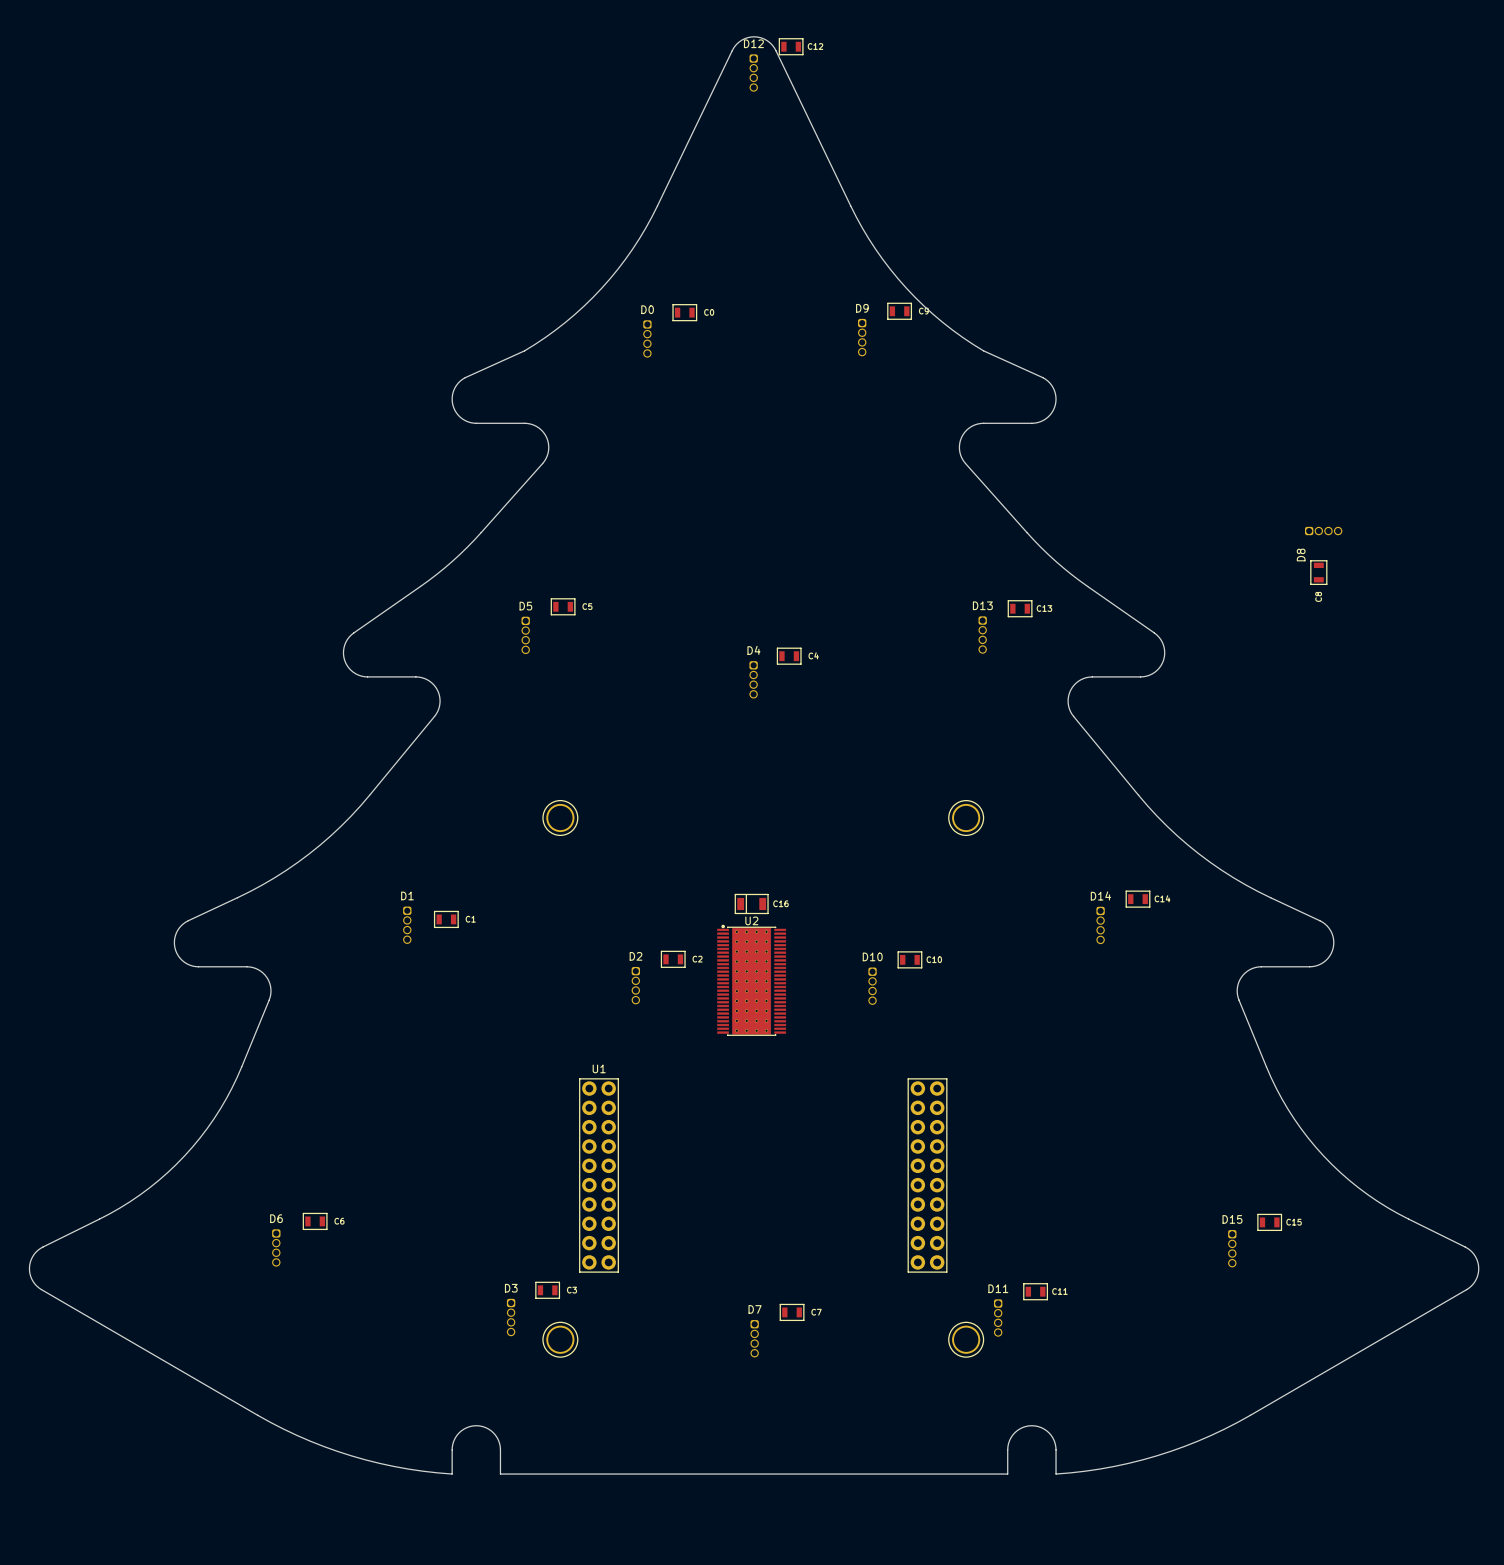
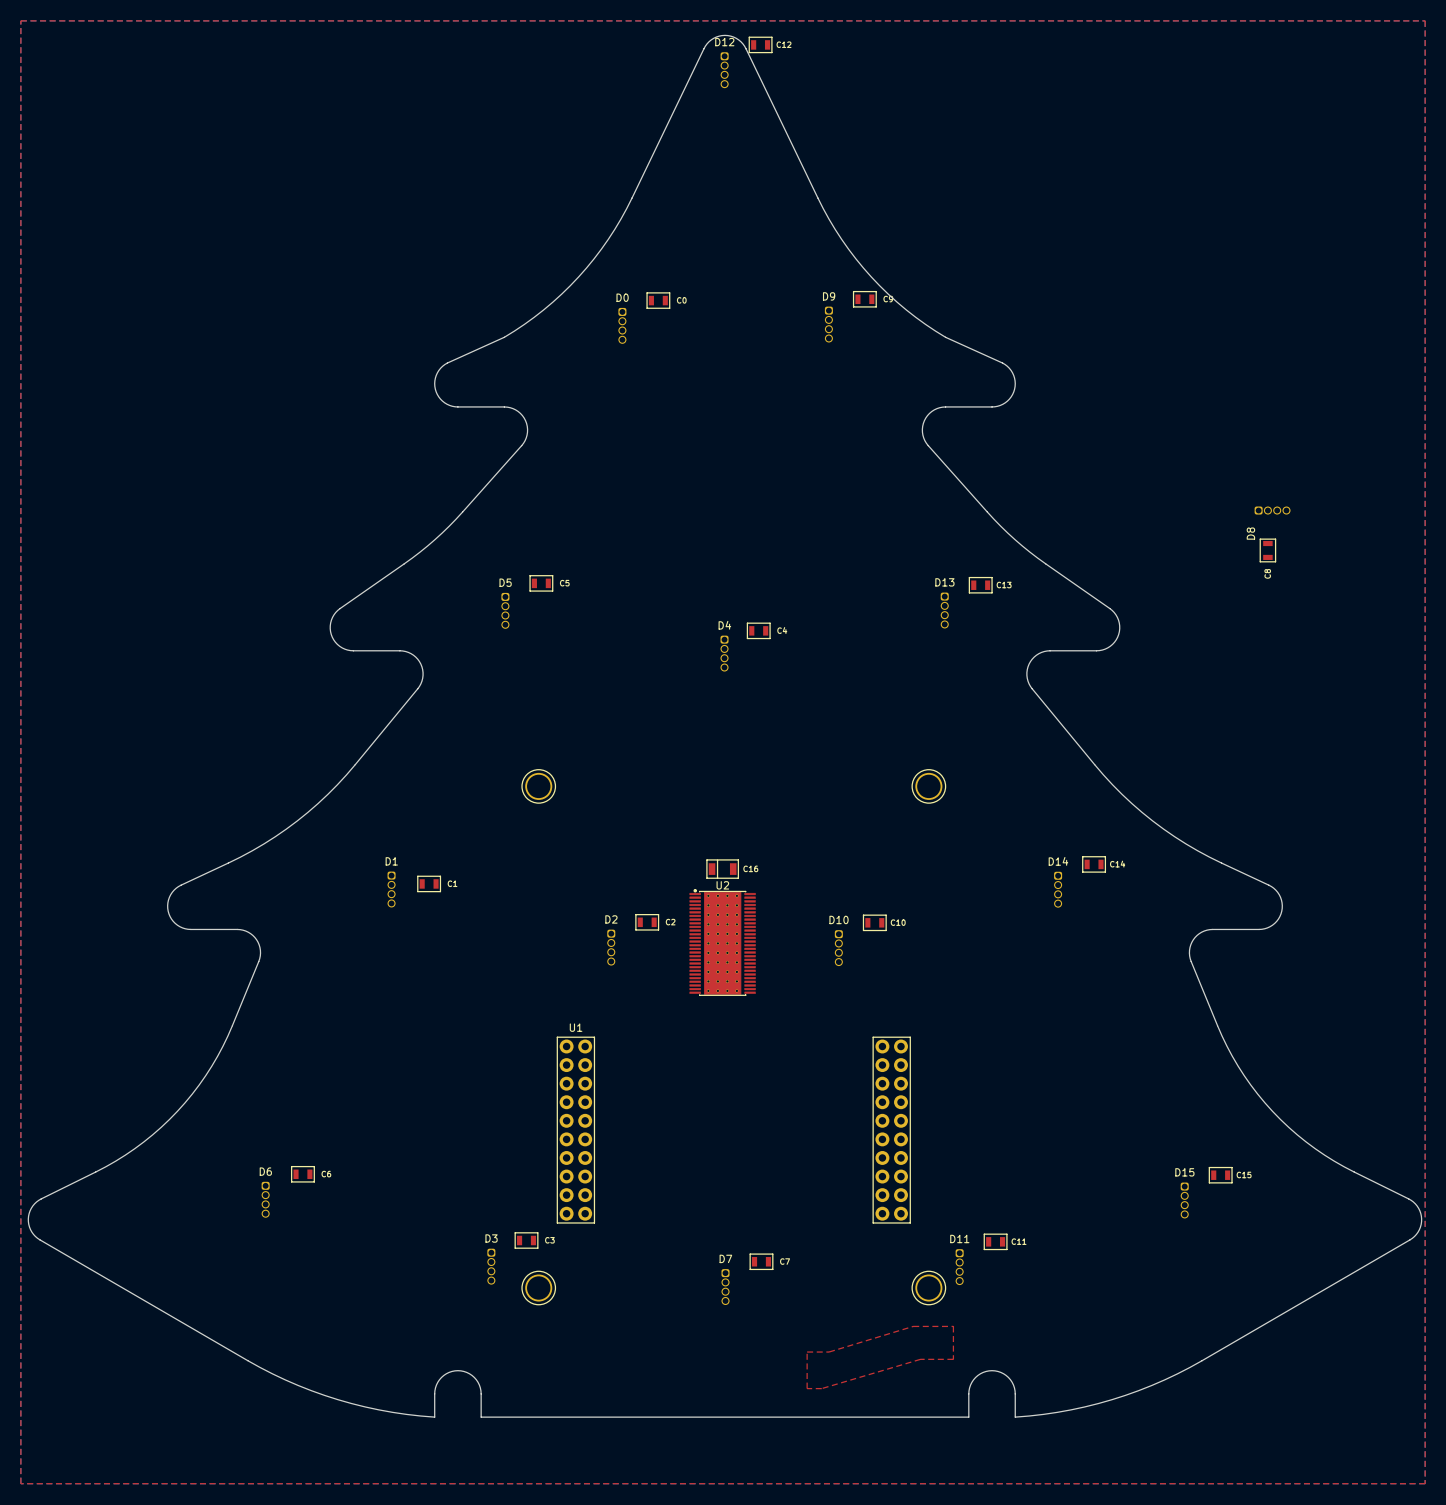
top zone outline: none -> (20, 20) (1425, 20) (1425, 1483) (20, 1483) (20, 20)
top zone outline: none -> (913, 1326) (829, 1352) (807, 1352) (807, 1388) (821, 1388) (920, 1359) (953, 1359) (953, 1326) (913, 1326)

